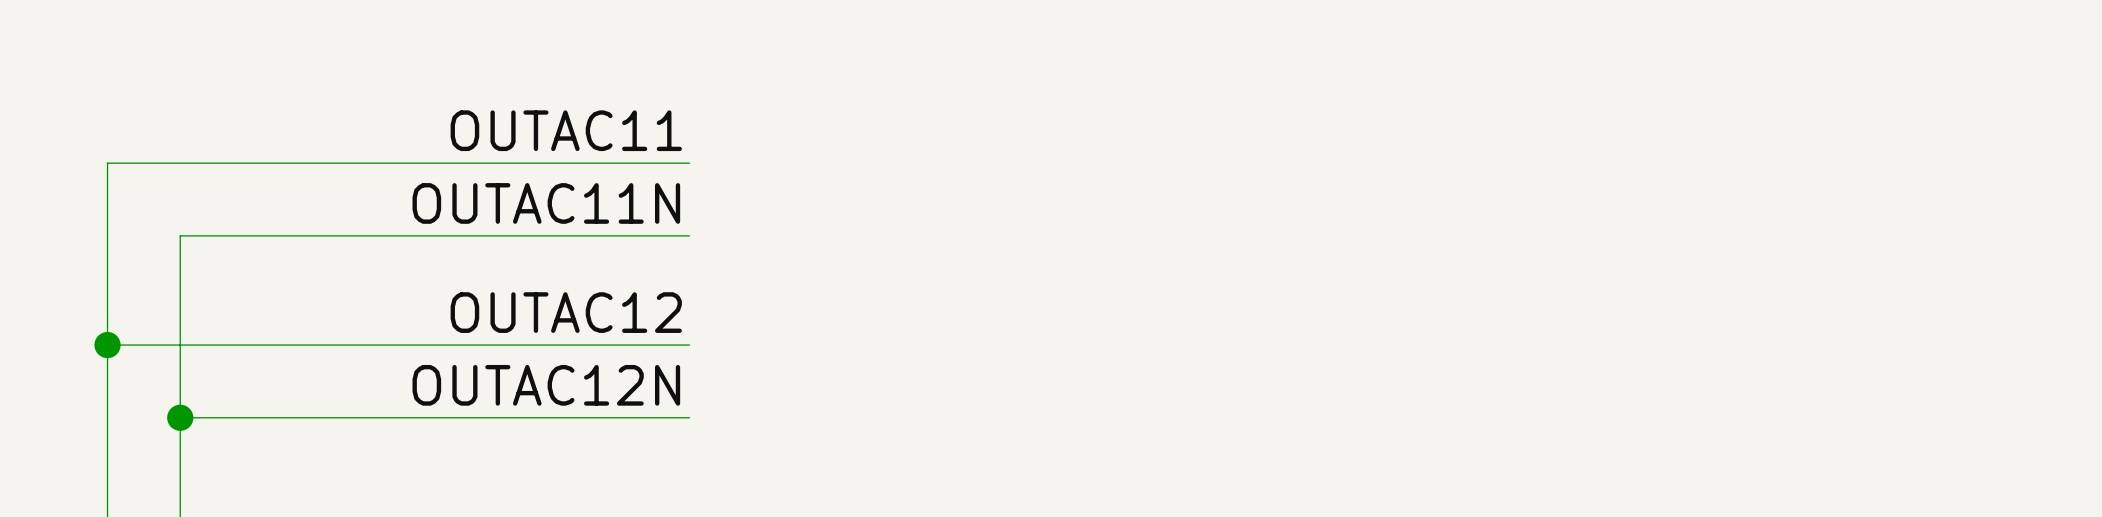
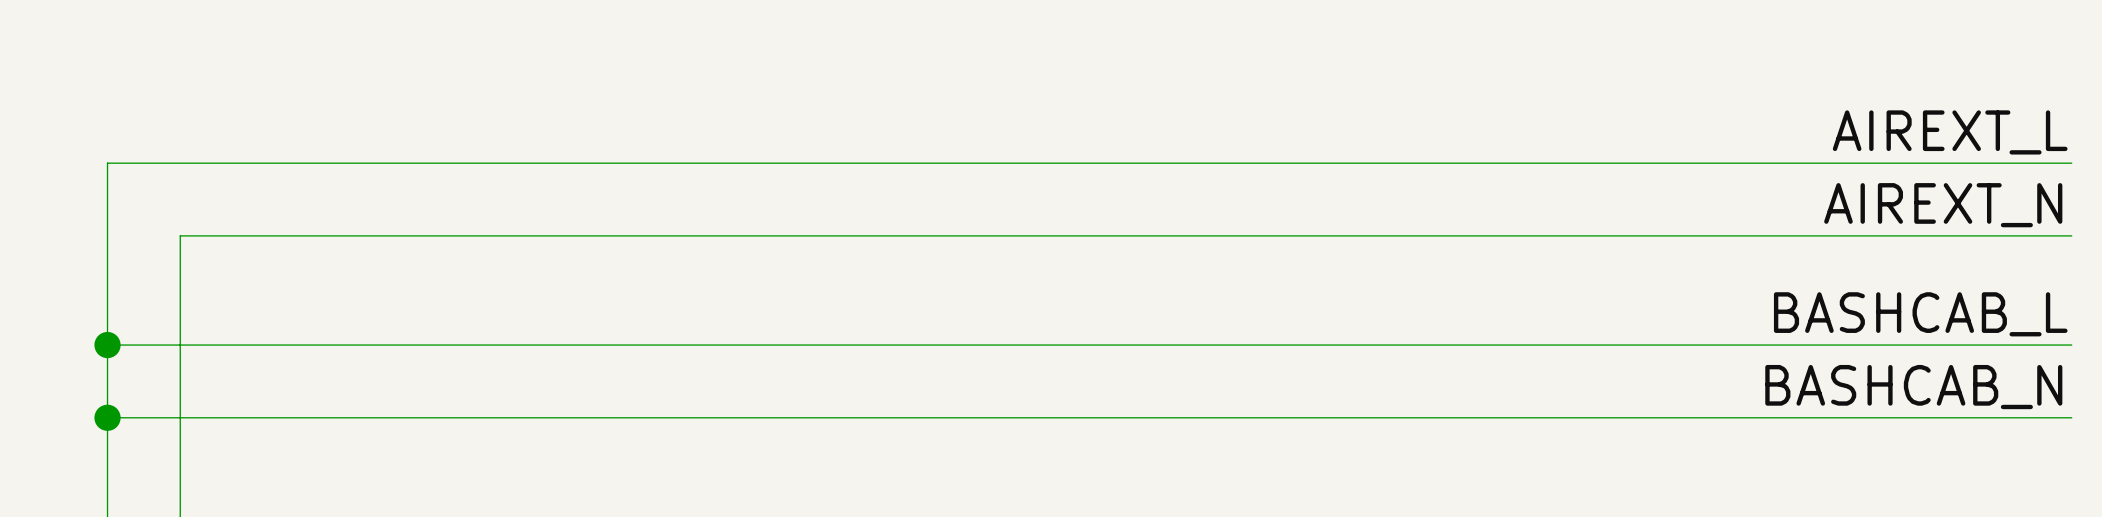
label: OUTAC11 (566, 130) -> none
label: none -> AIREXT_L (1950, 132)
wire: none -> (689, 163) (2071, 163)
label: OUTAC11N (546, 203) -> none
label: none -> AIREXT_N (1943, 205)
wire: none -> (689, 235) (2071, 235)
label: OUTAC12 (566, 312) -> none
label: none -> BASHCAB_L (1920, 314)
wire: none -> (689, 345) (2071, 345)
label: OUTAC12N (546, 385) -> none
label: none -> BASHCAB_N (1913, 387)
wire: none -> (107, 417) (180, 417)
junction position: (180, 417) -> (107, 417)
wire: none -> (689, 417) (2071, 417)

